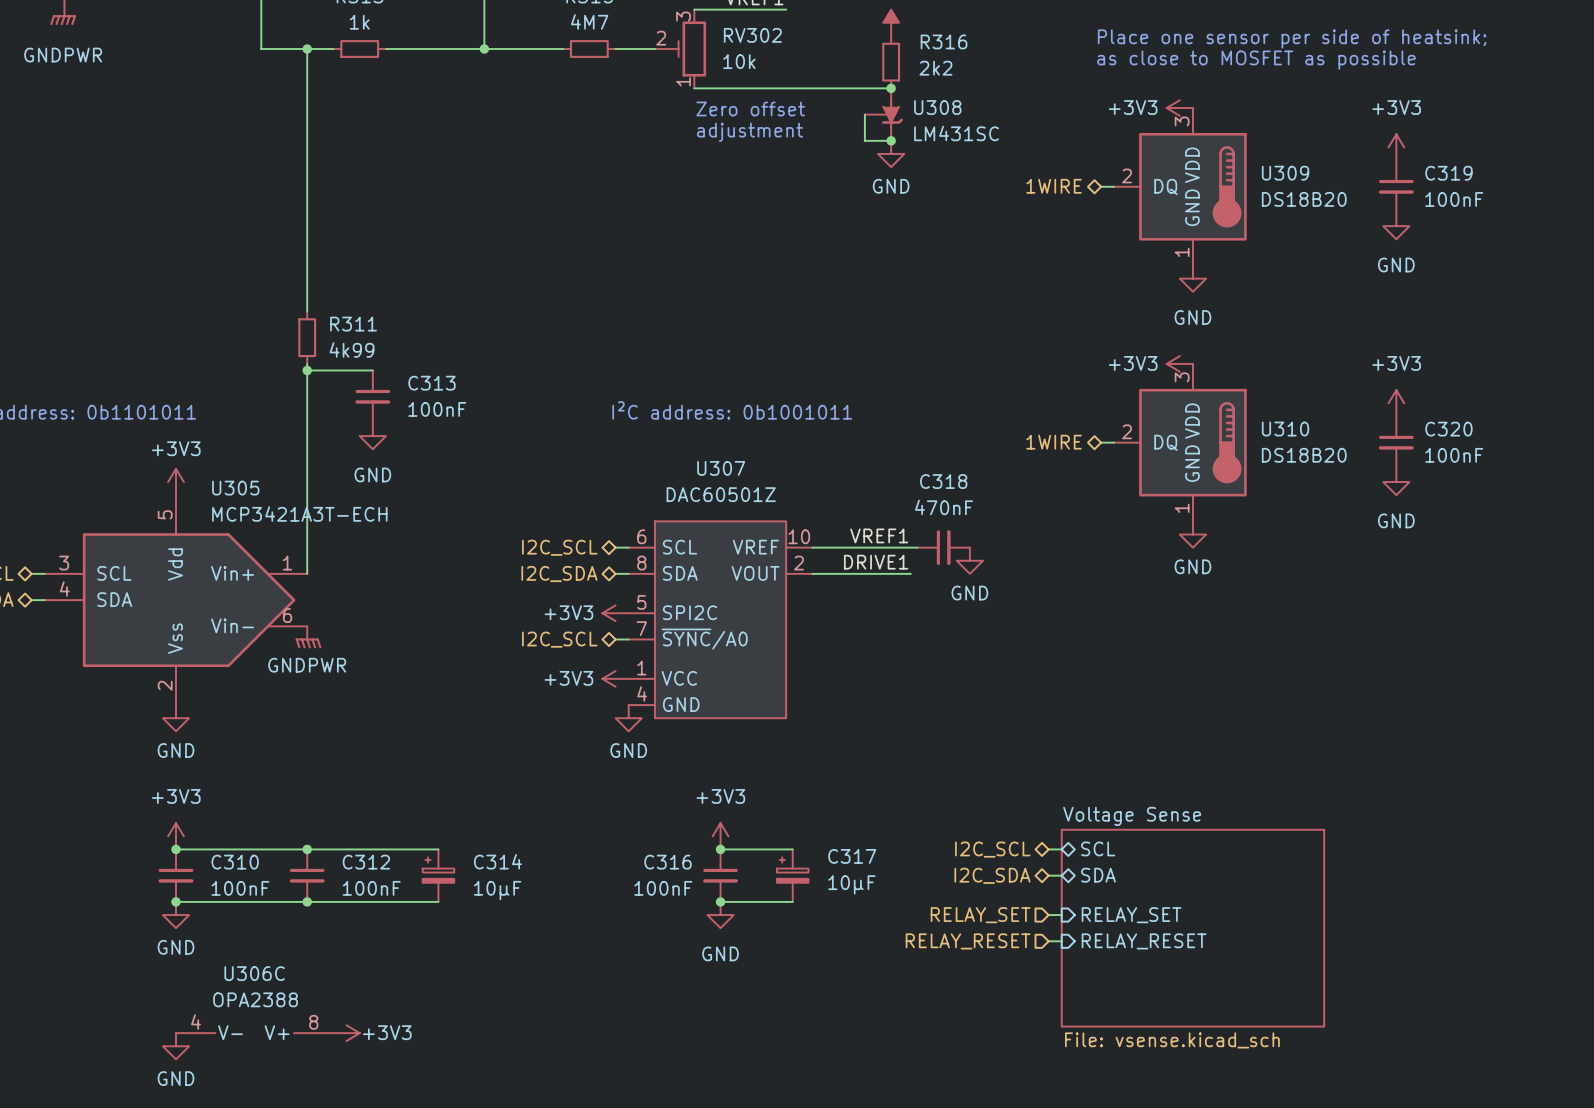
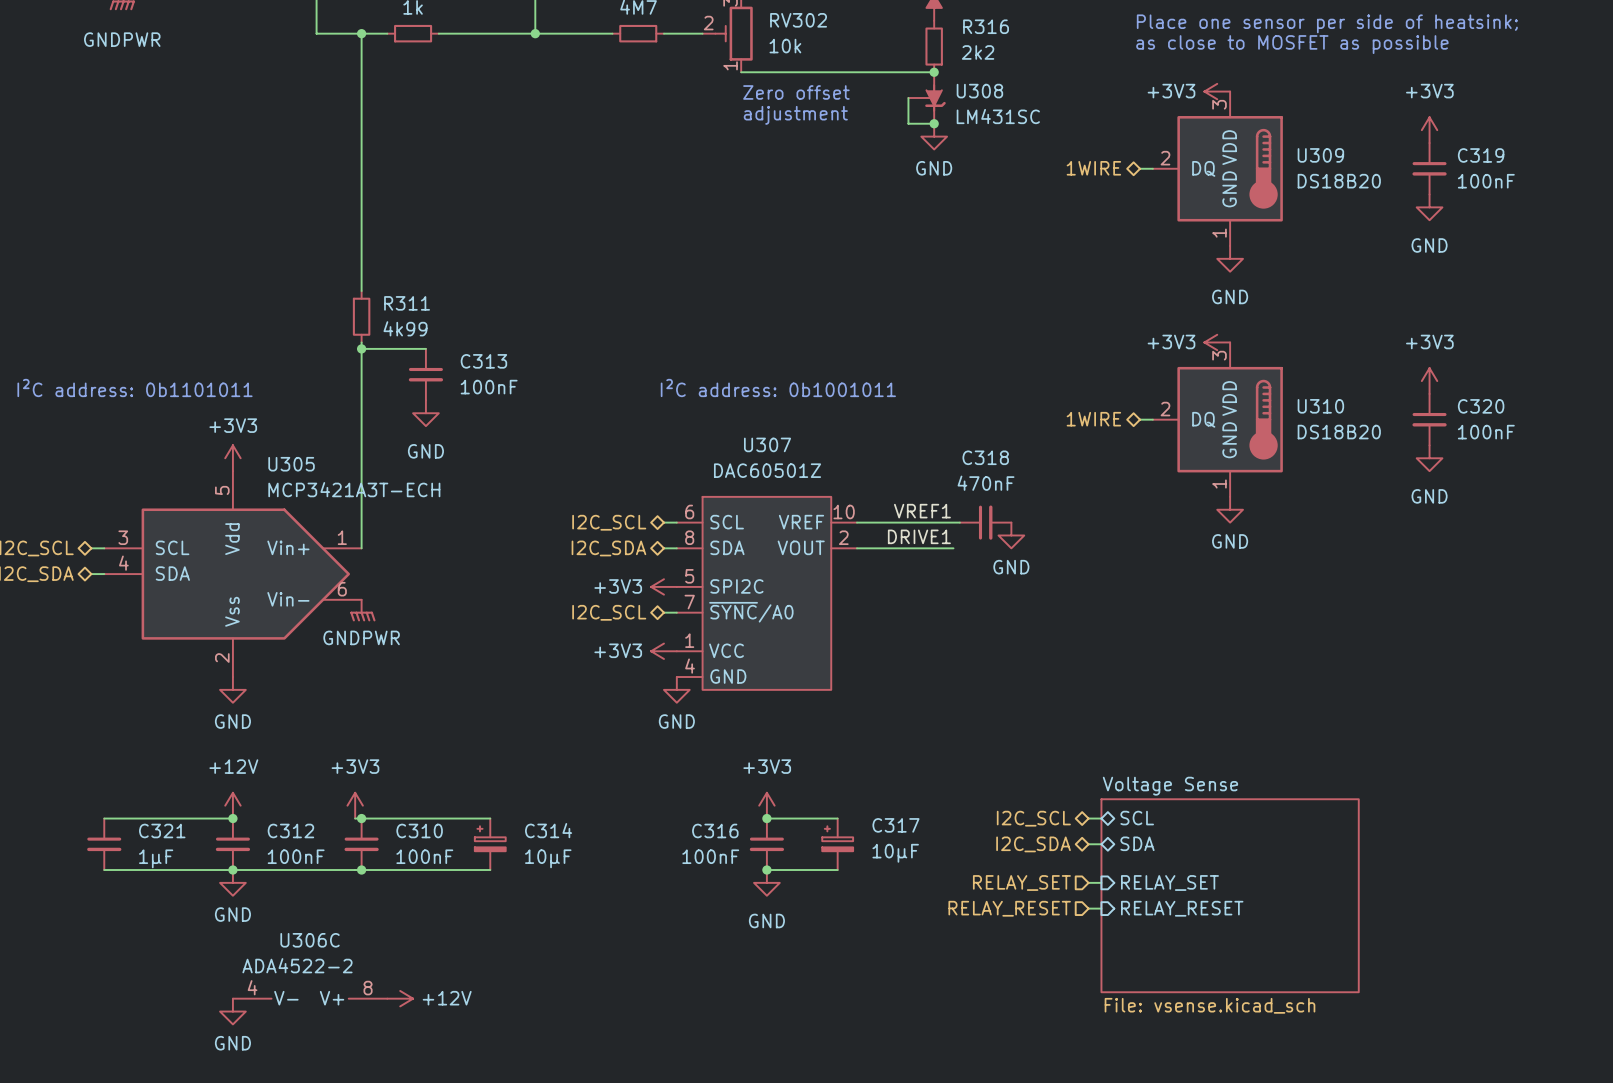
power symbol: +3V3 (176, 836) -> +12V (232, 805)
power symbol: none -> +3V3 (355, 805)
wire: (176, 849) (300, 849) -> (232, 818) (104, 818)
C310 name: C310 (235, 862) -> C312 (290, 830)
C312 name: C312 (366, 862) -> C310 (419, 830)
C321: none -> 1µF (104, 844)
wire: none -> (104, 870) (232, 870)
U306C value: OPA2388 (255, 999) -> ADA4522-2 (297, 965)
power symbol: +3V3 (346, 1033) -> +12V (400, 998)

